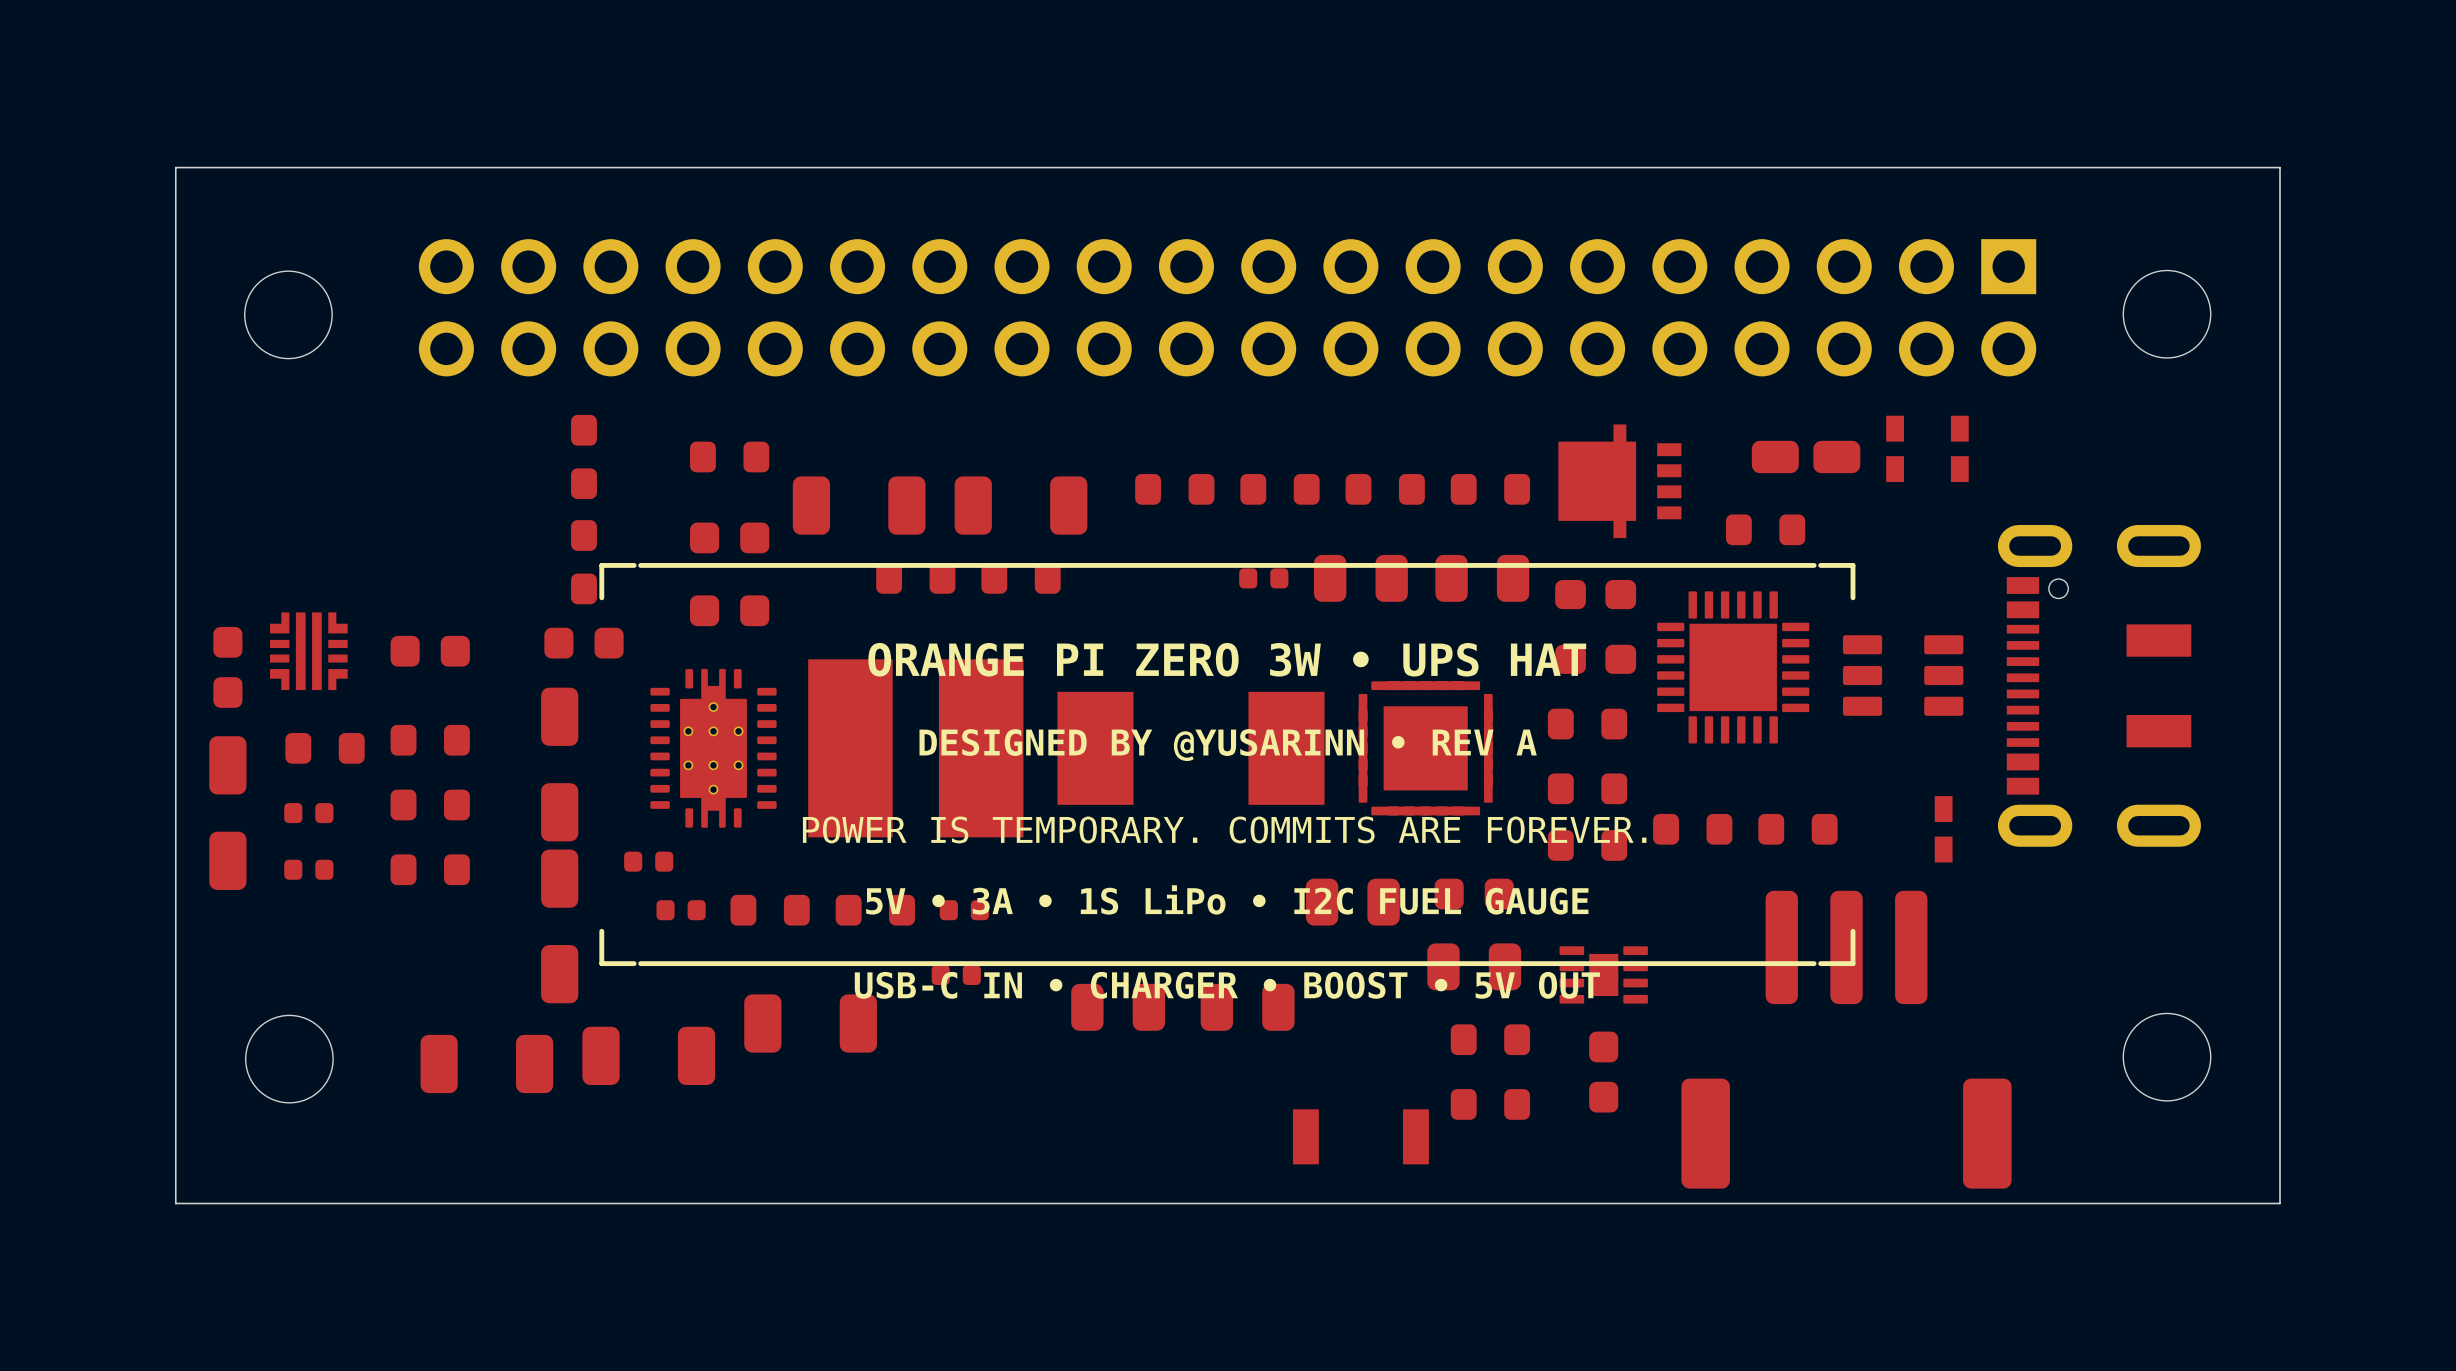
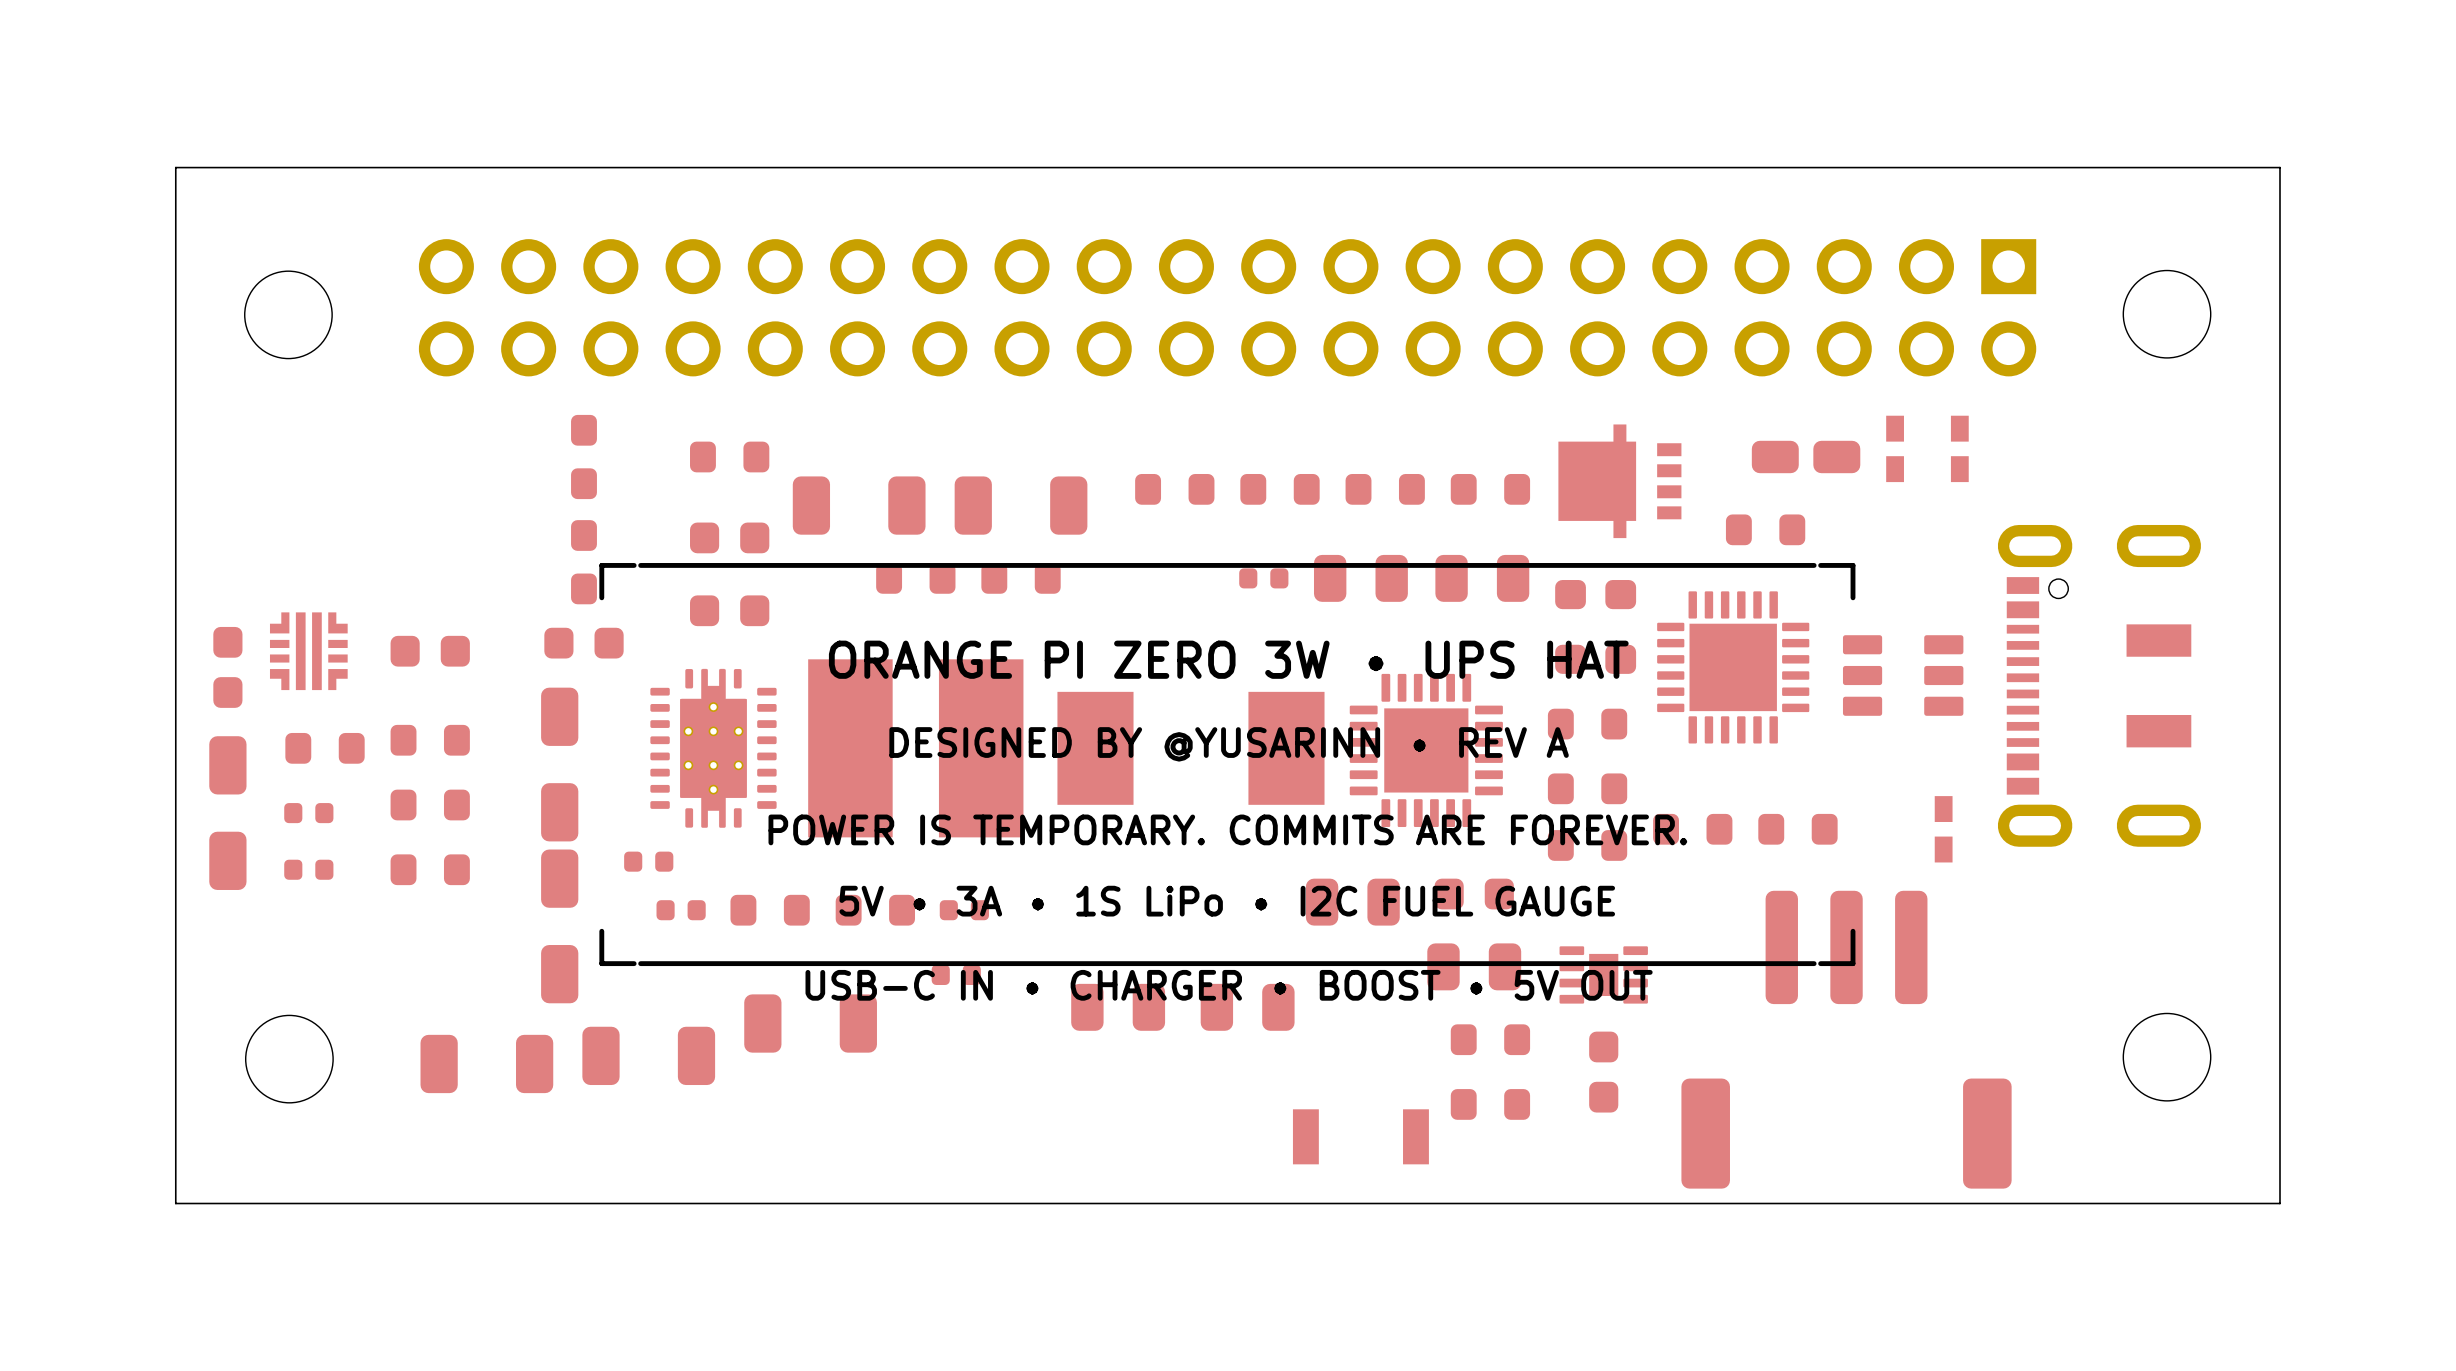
part footprint: [1358, 681, 1493, 816] -> [1349, 673, 1503, 828]

